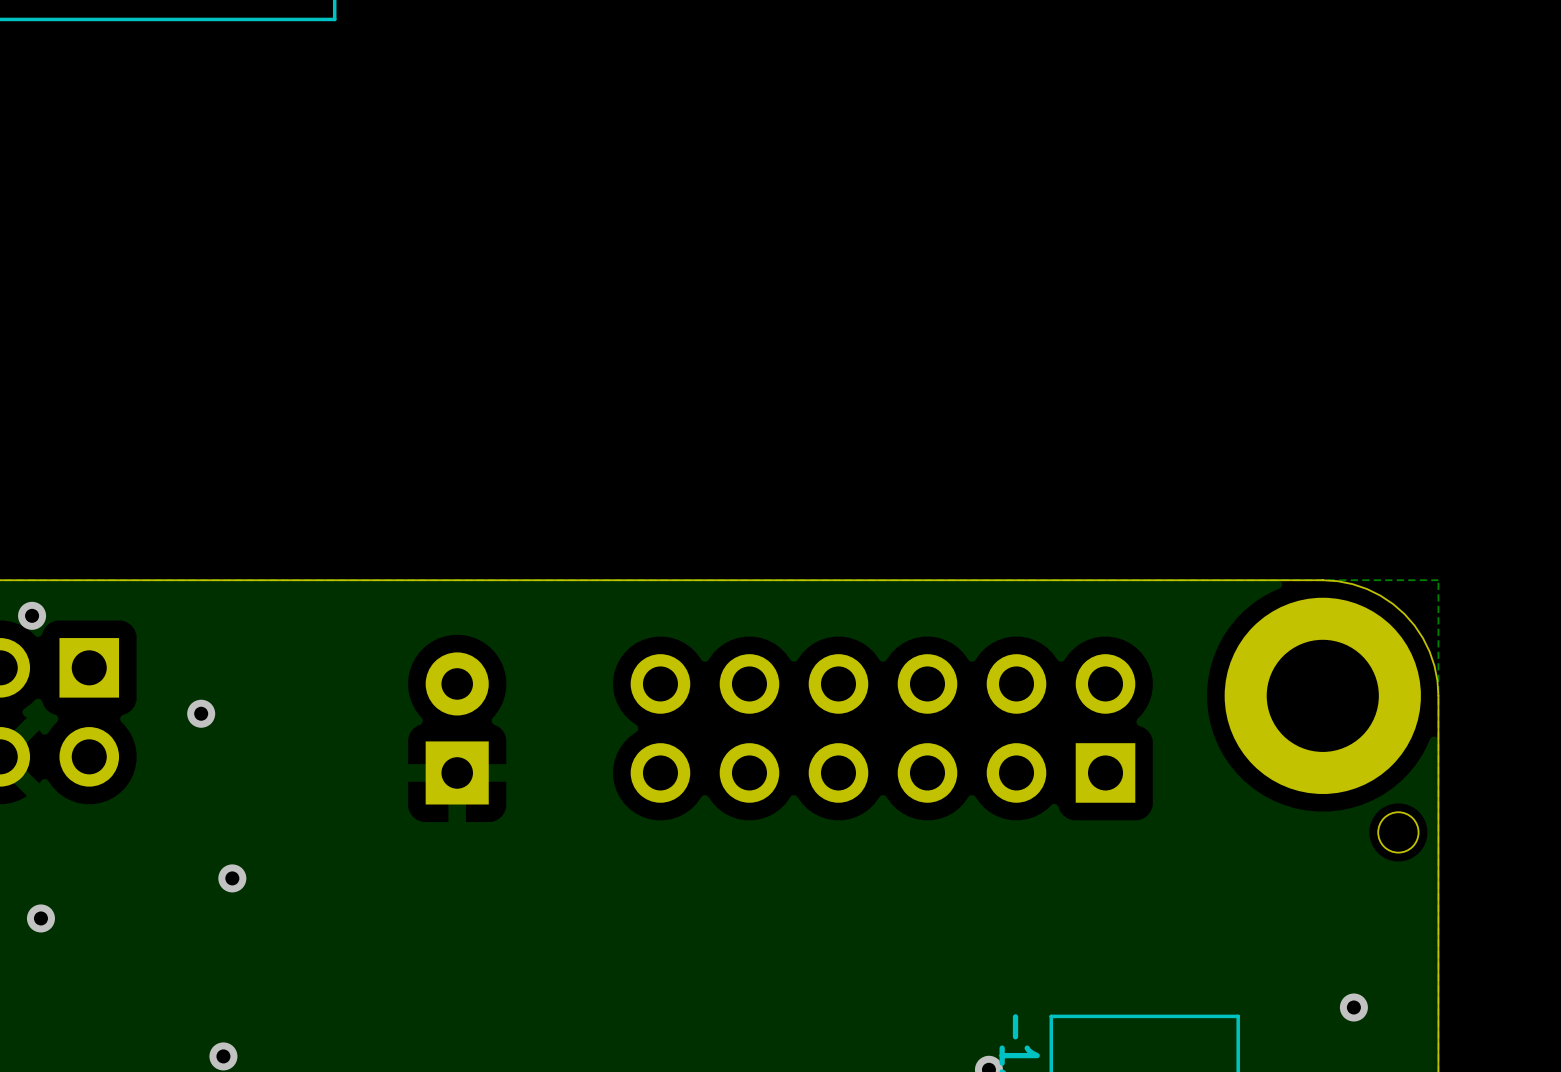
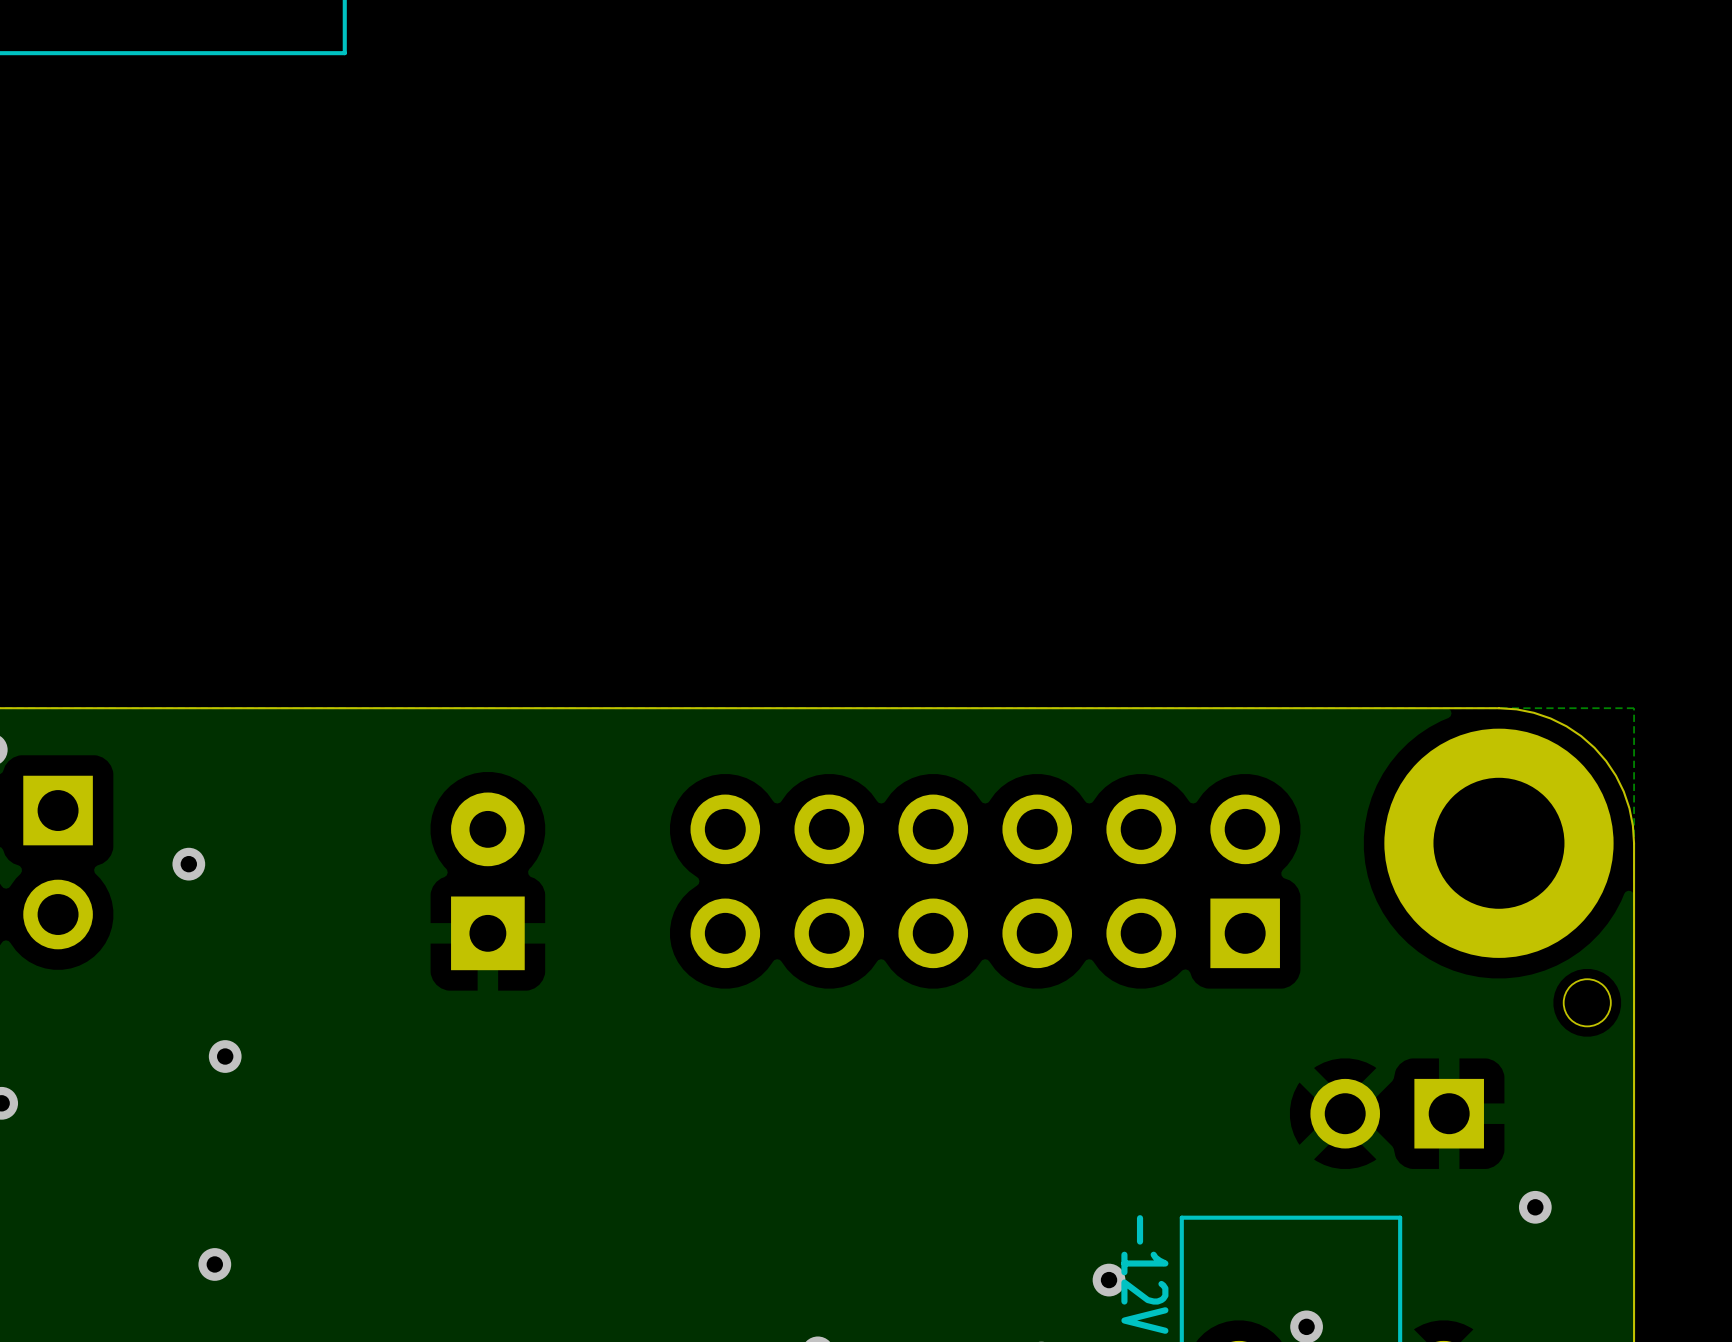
part: none -> (1397, 1113)

